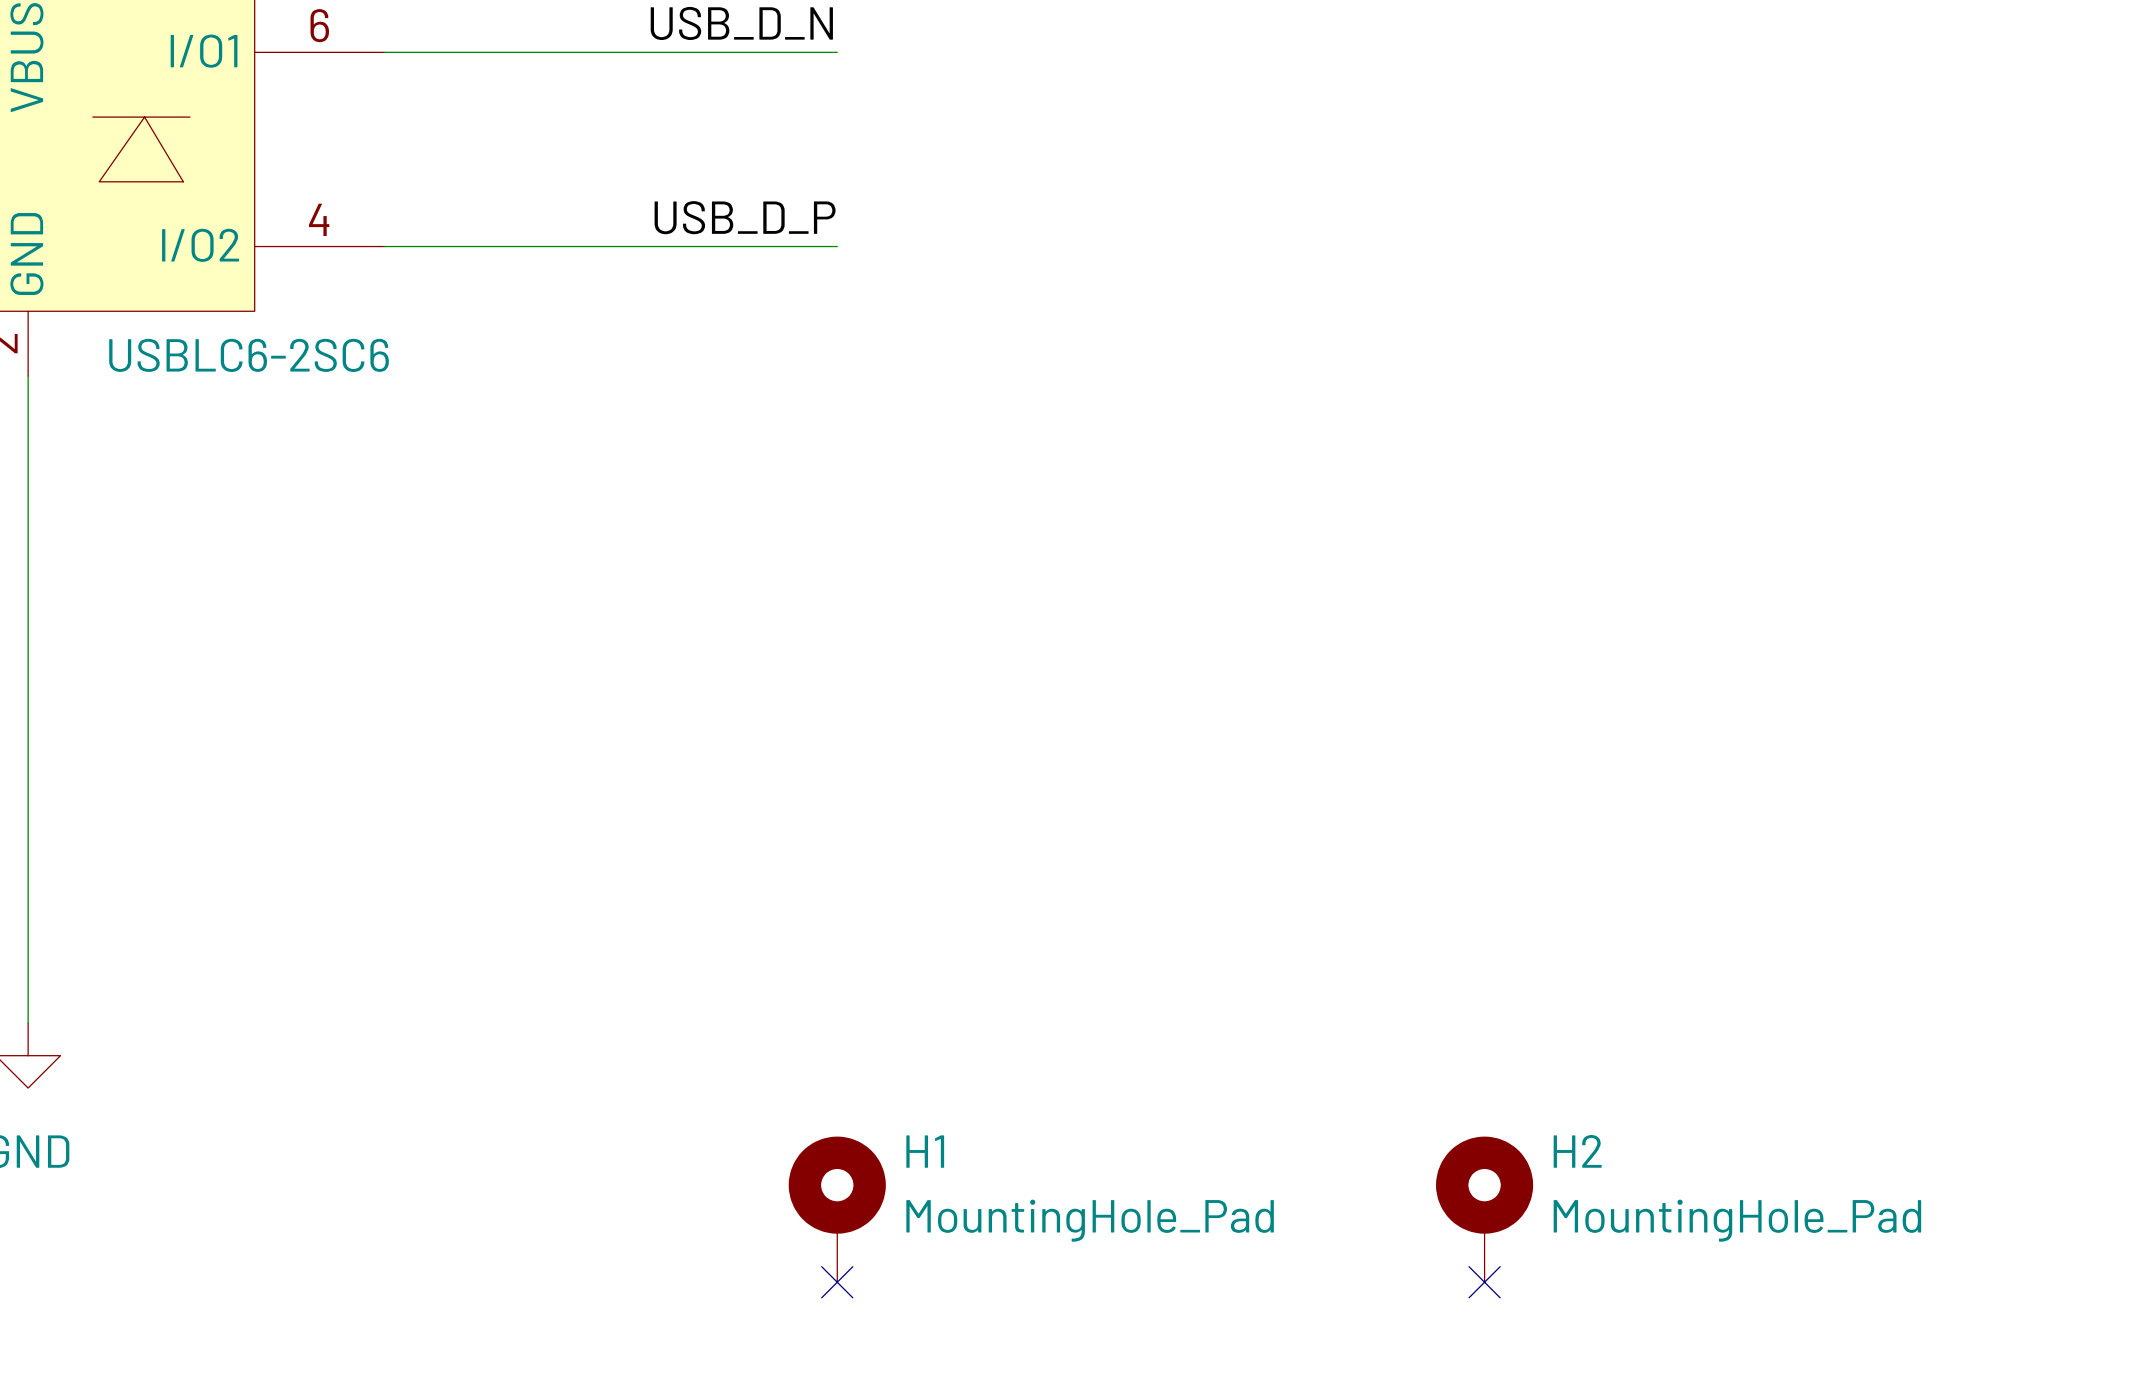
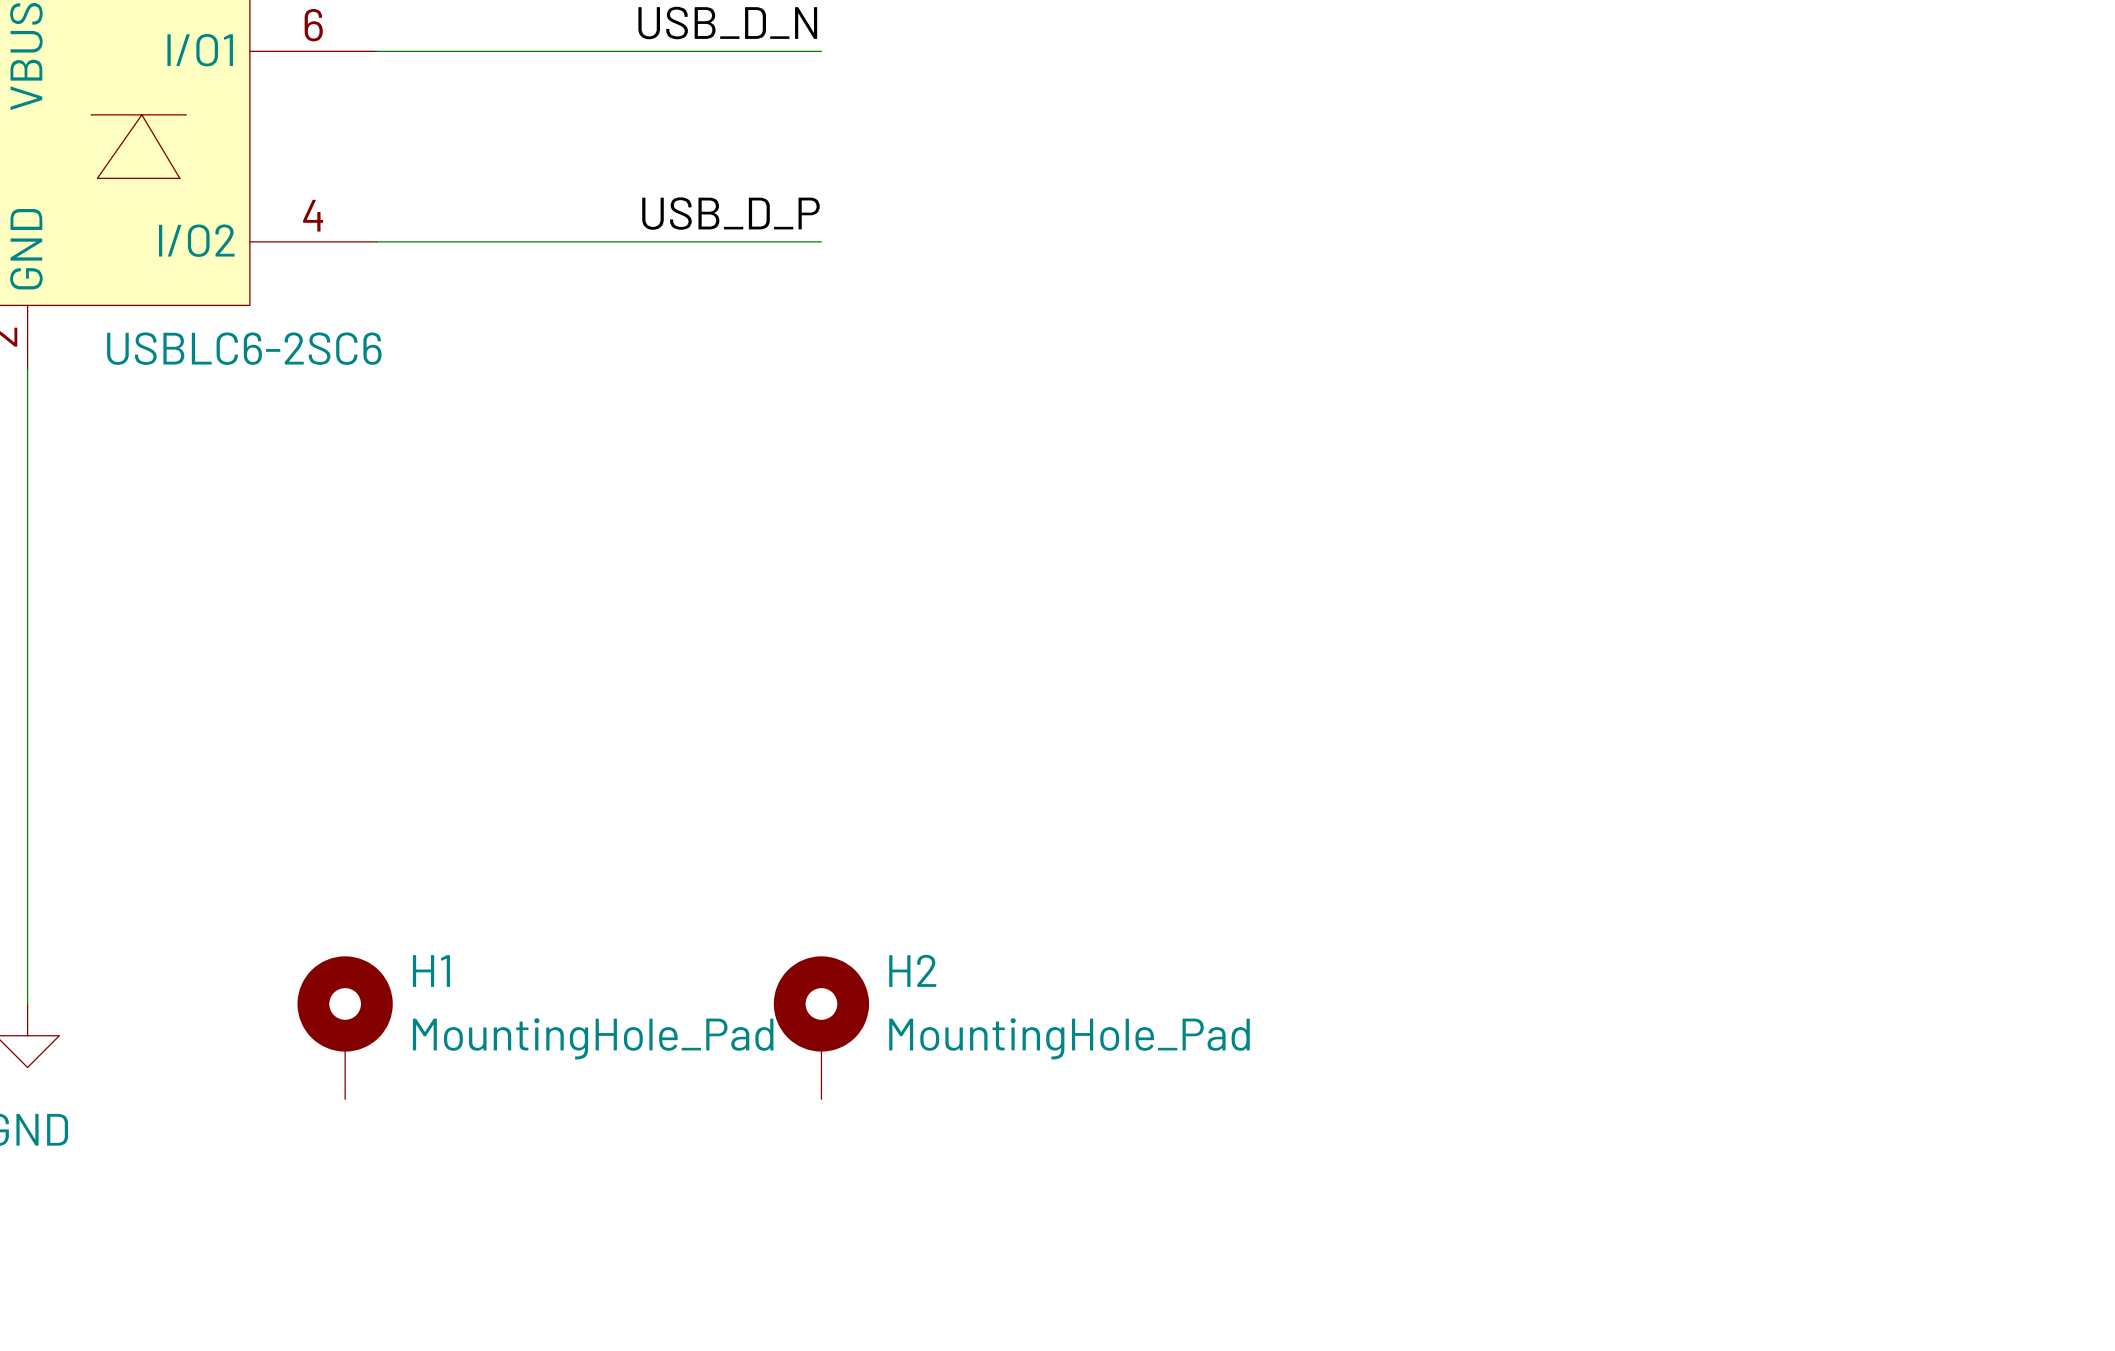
H1 position: (837, 1209) -> (345, 1027)
H2 position: (1484, 1209) -> (821, 1027)
no-connect mark: (837, 1282) -> none
no-connect mark: (1484, 1282) -> none

